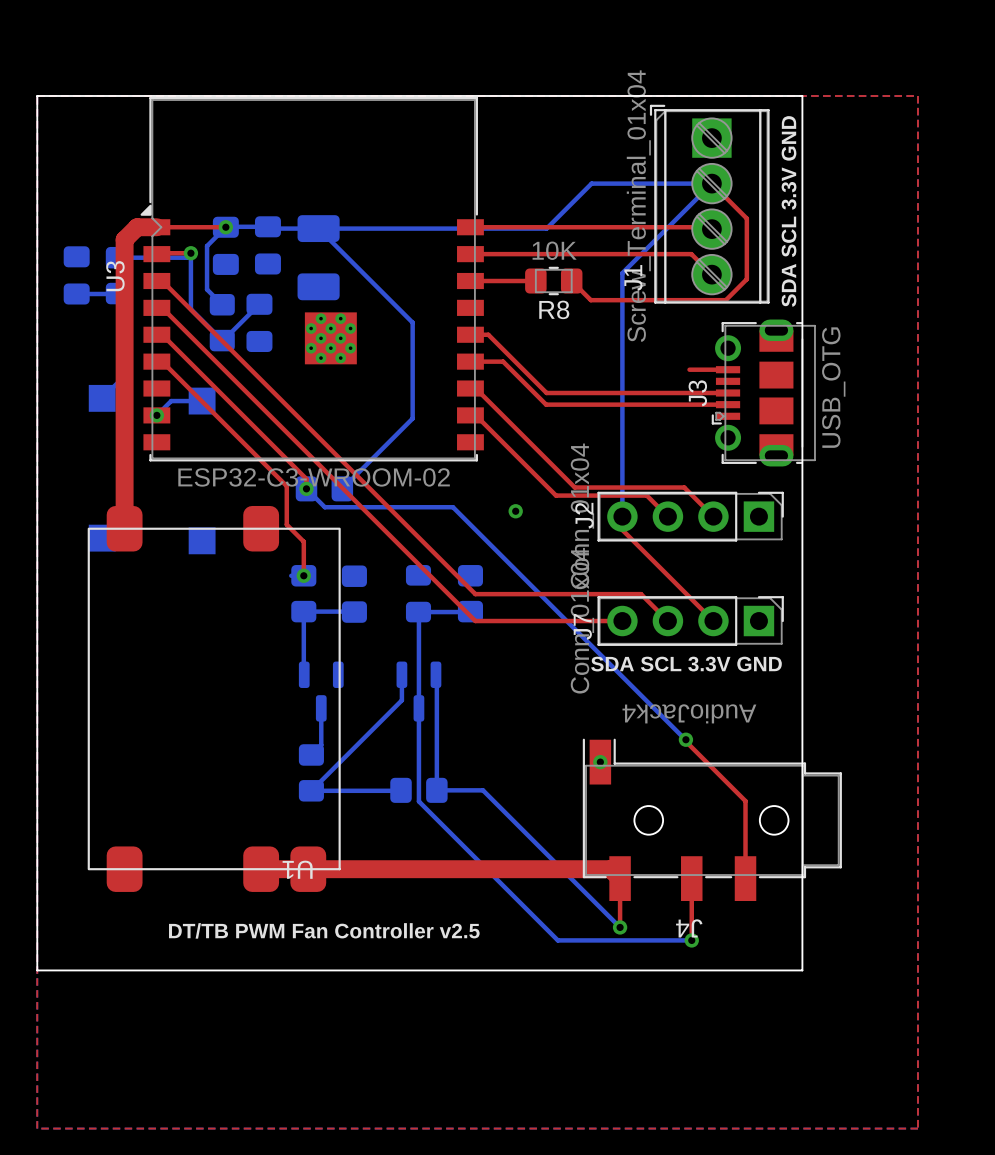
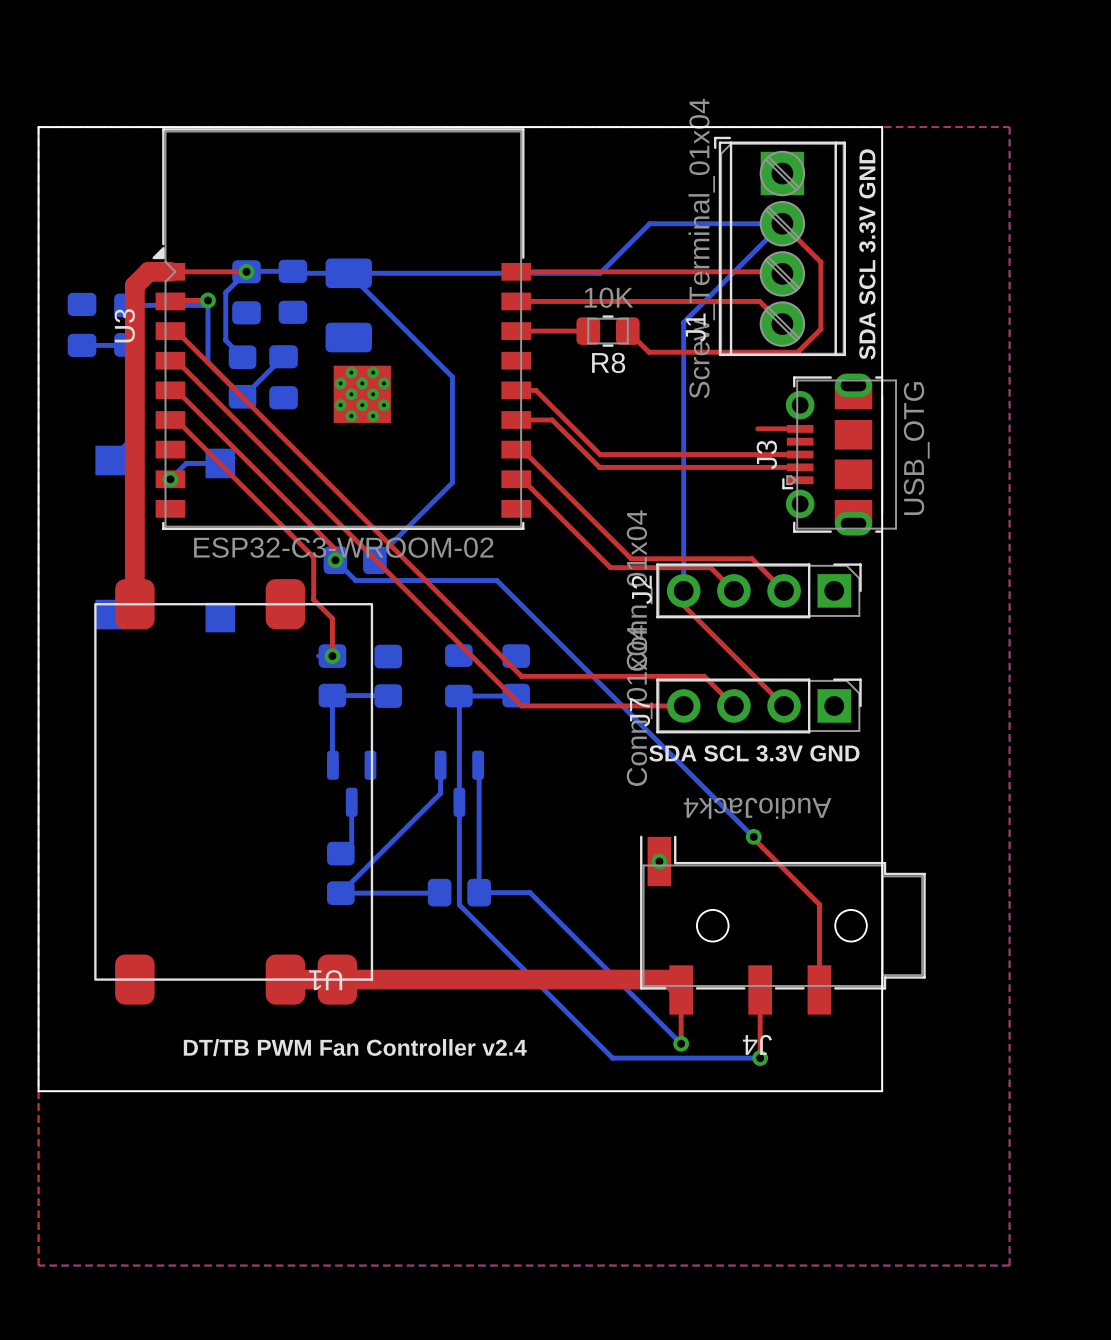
via: (515, 511) -> none
text: DT/TB PWM Fan Controller v2.5 (324, 930) -> DT/TB PWM Fan Controller v2.4 (355, 1047)

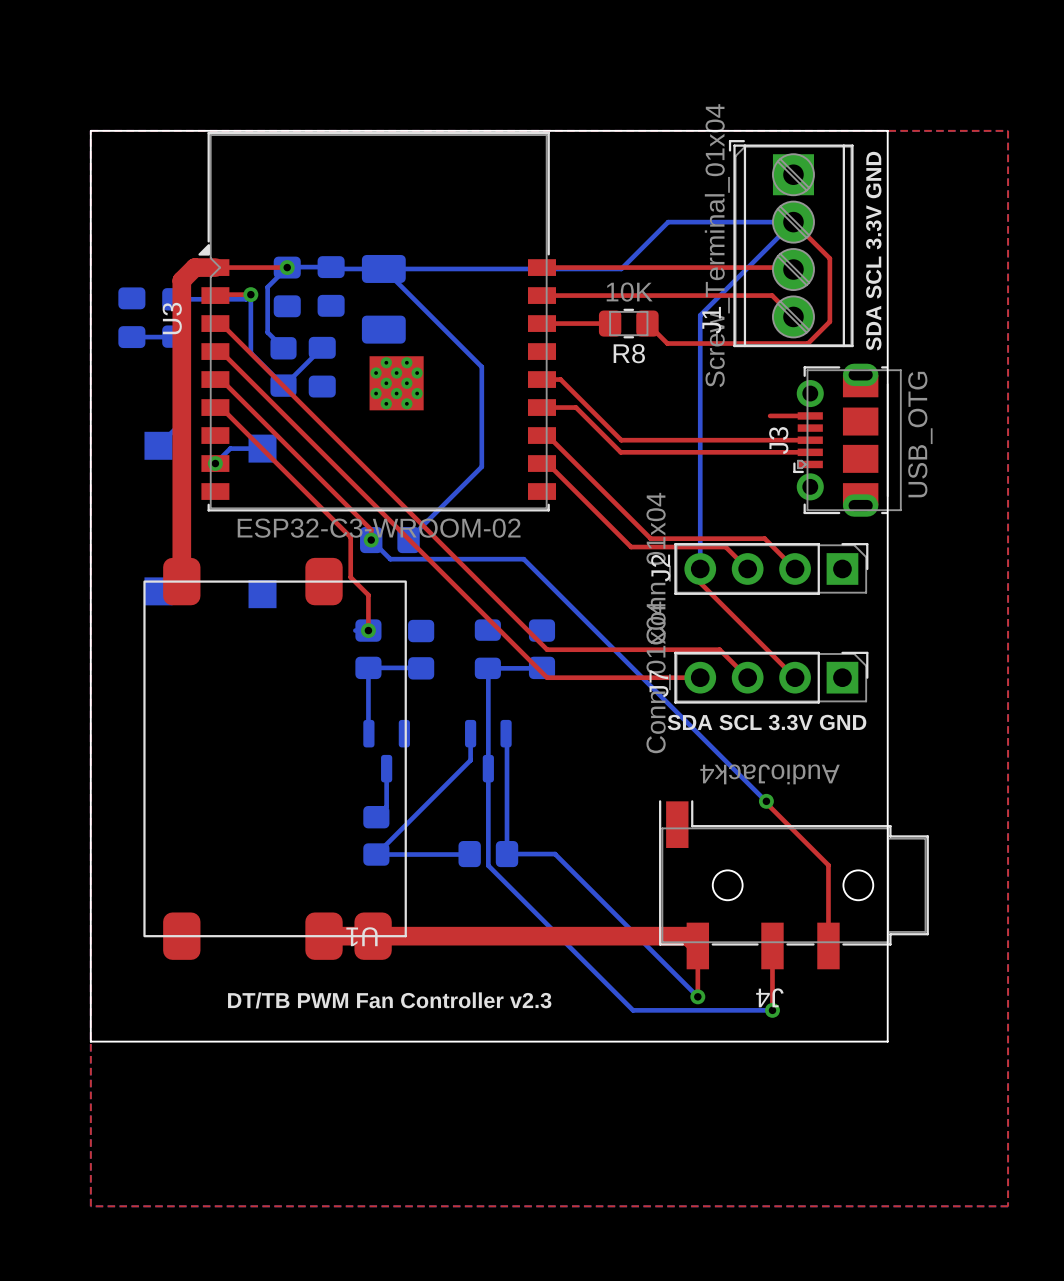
via: (659, 861) -> none
text: DT/TB PWM Fan Controller v2.4 (355, 1047) -> DT/TB PWM Fan Controller v2.3 (389, 1000)

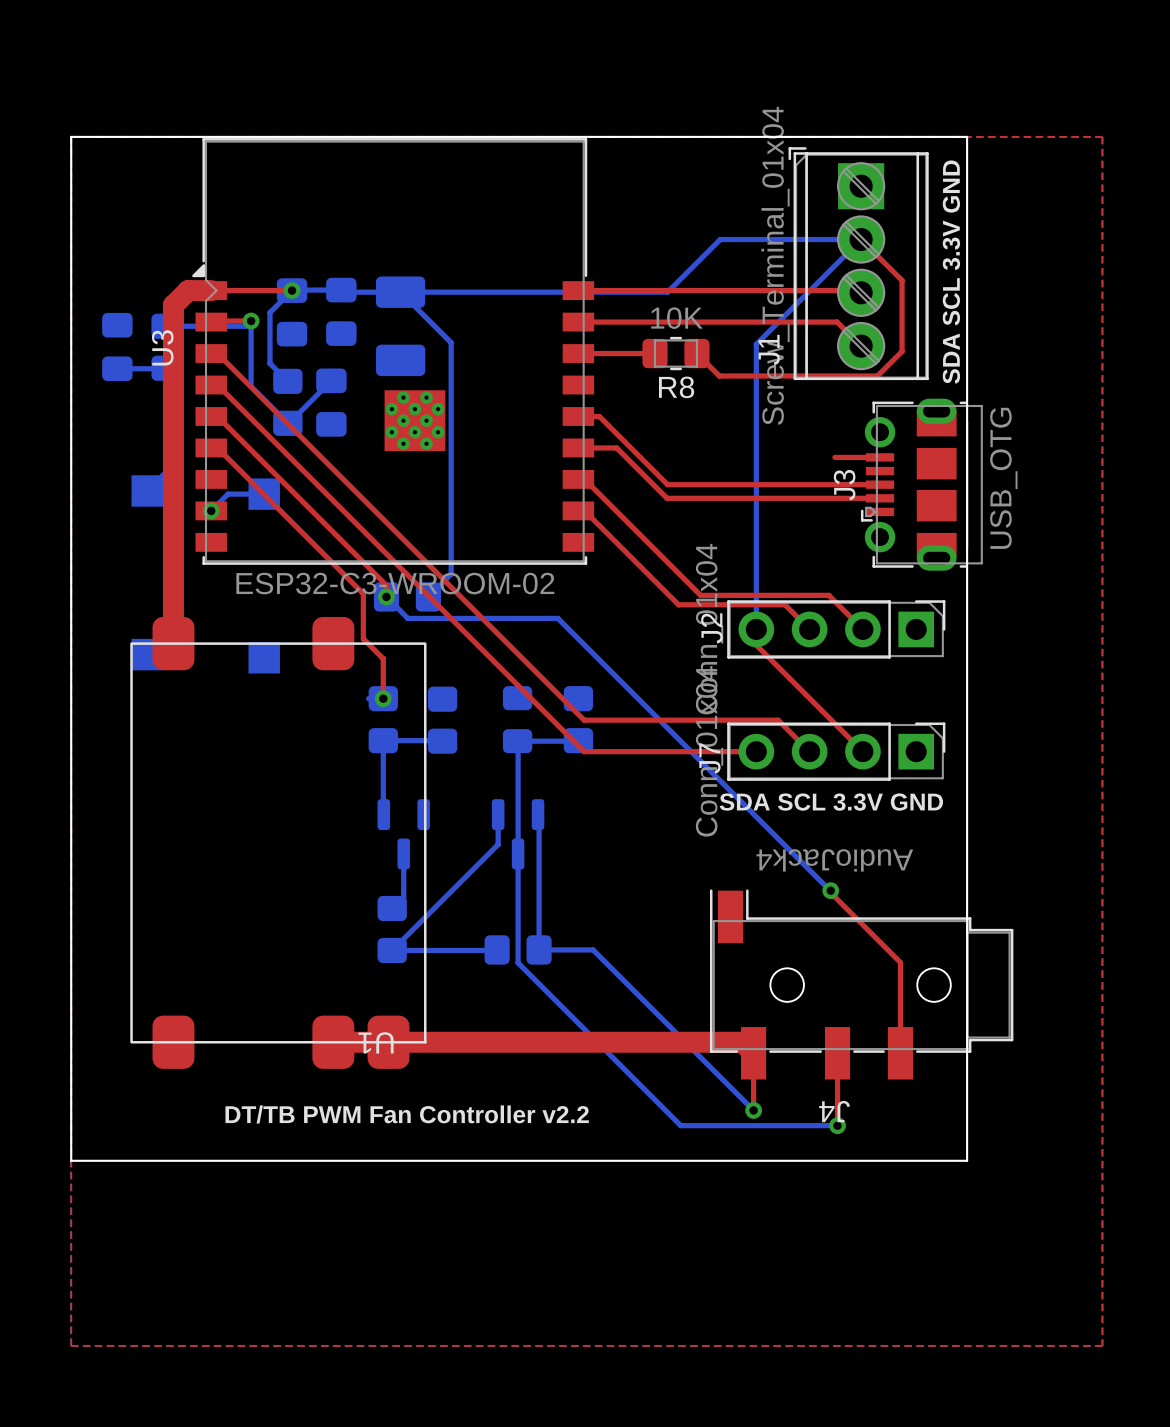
bottom track: (428, 313) (481, 366) (481, 466) (428, 519) -> (451, 342) (451, 574)
text: DT/TB PWM Fan Controller v2.3 (389, 1000) -> DT/TB PWM Fan Controller v2.2 (407, 1114)

